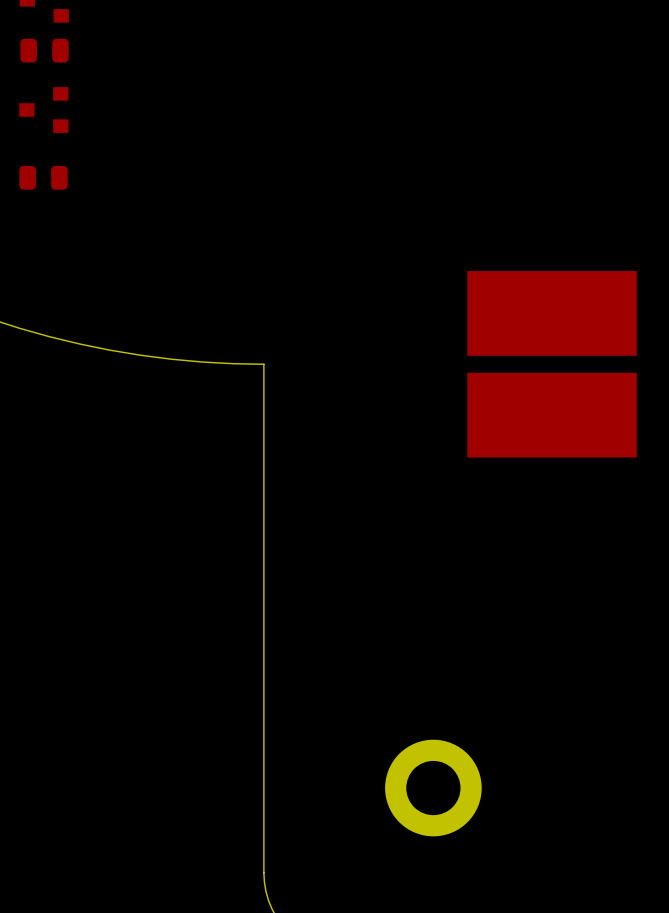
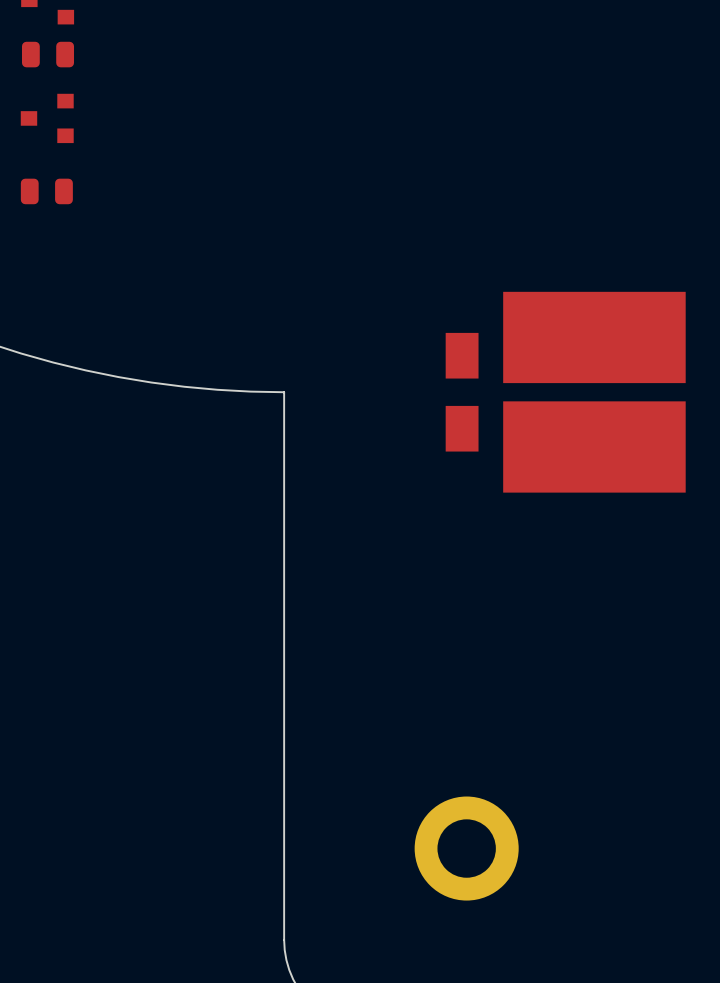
part: none -> (462, 392)

